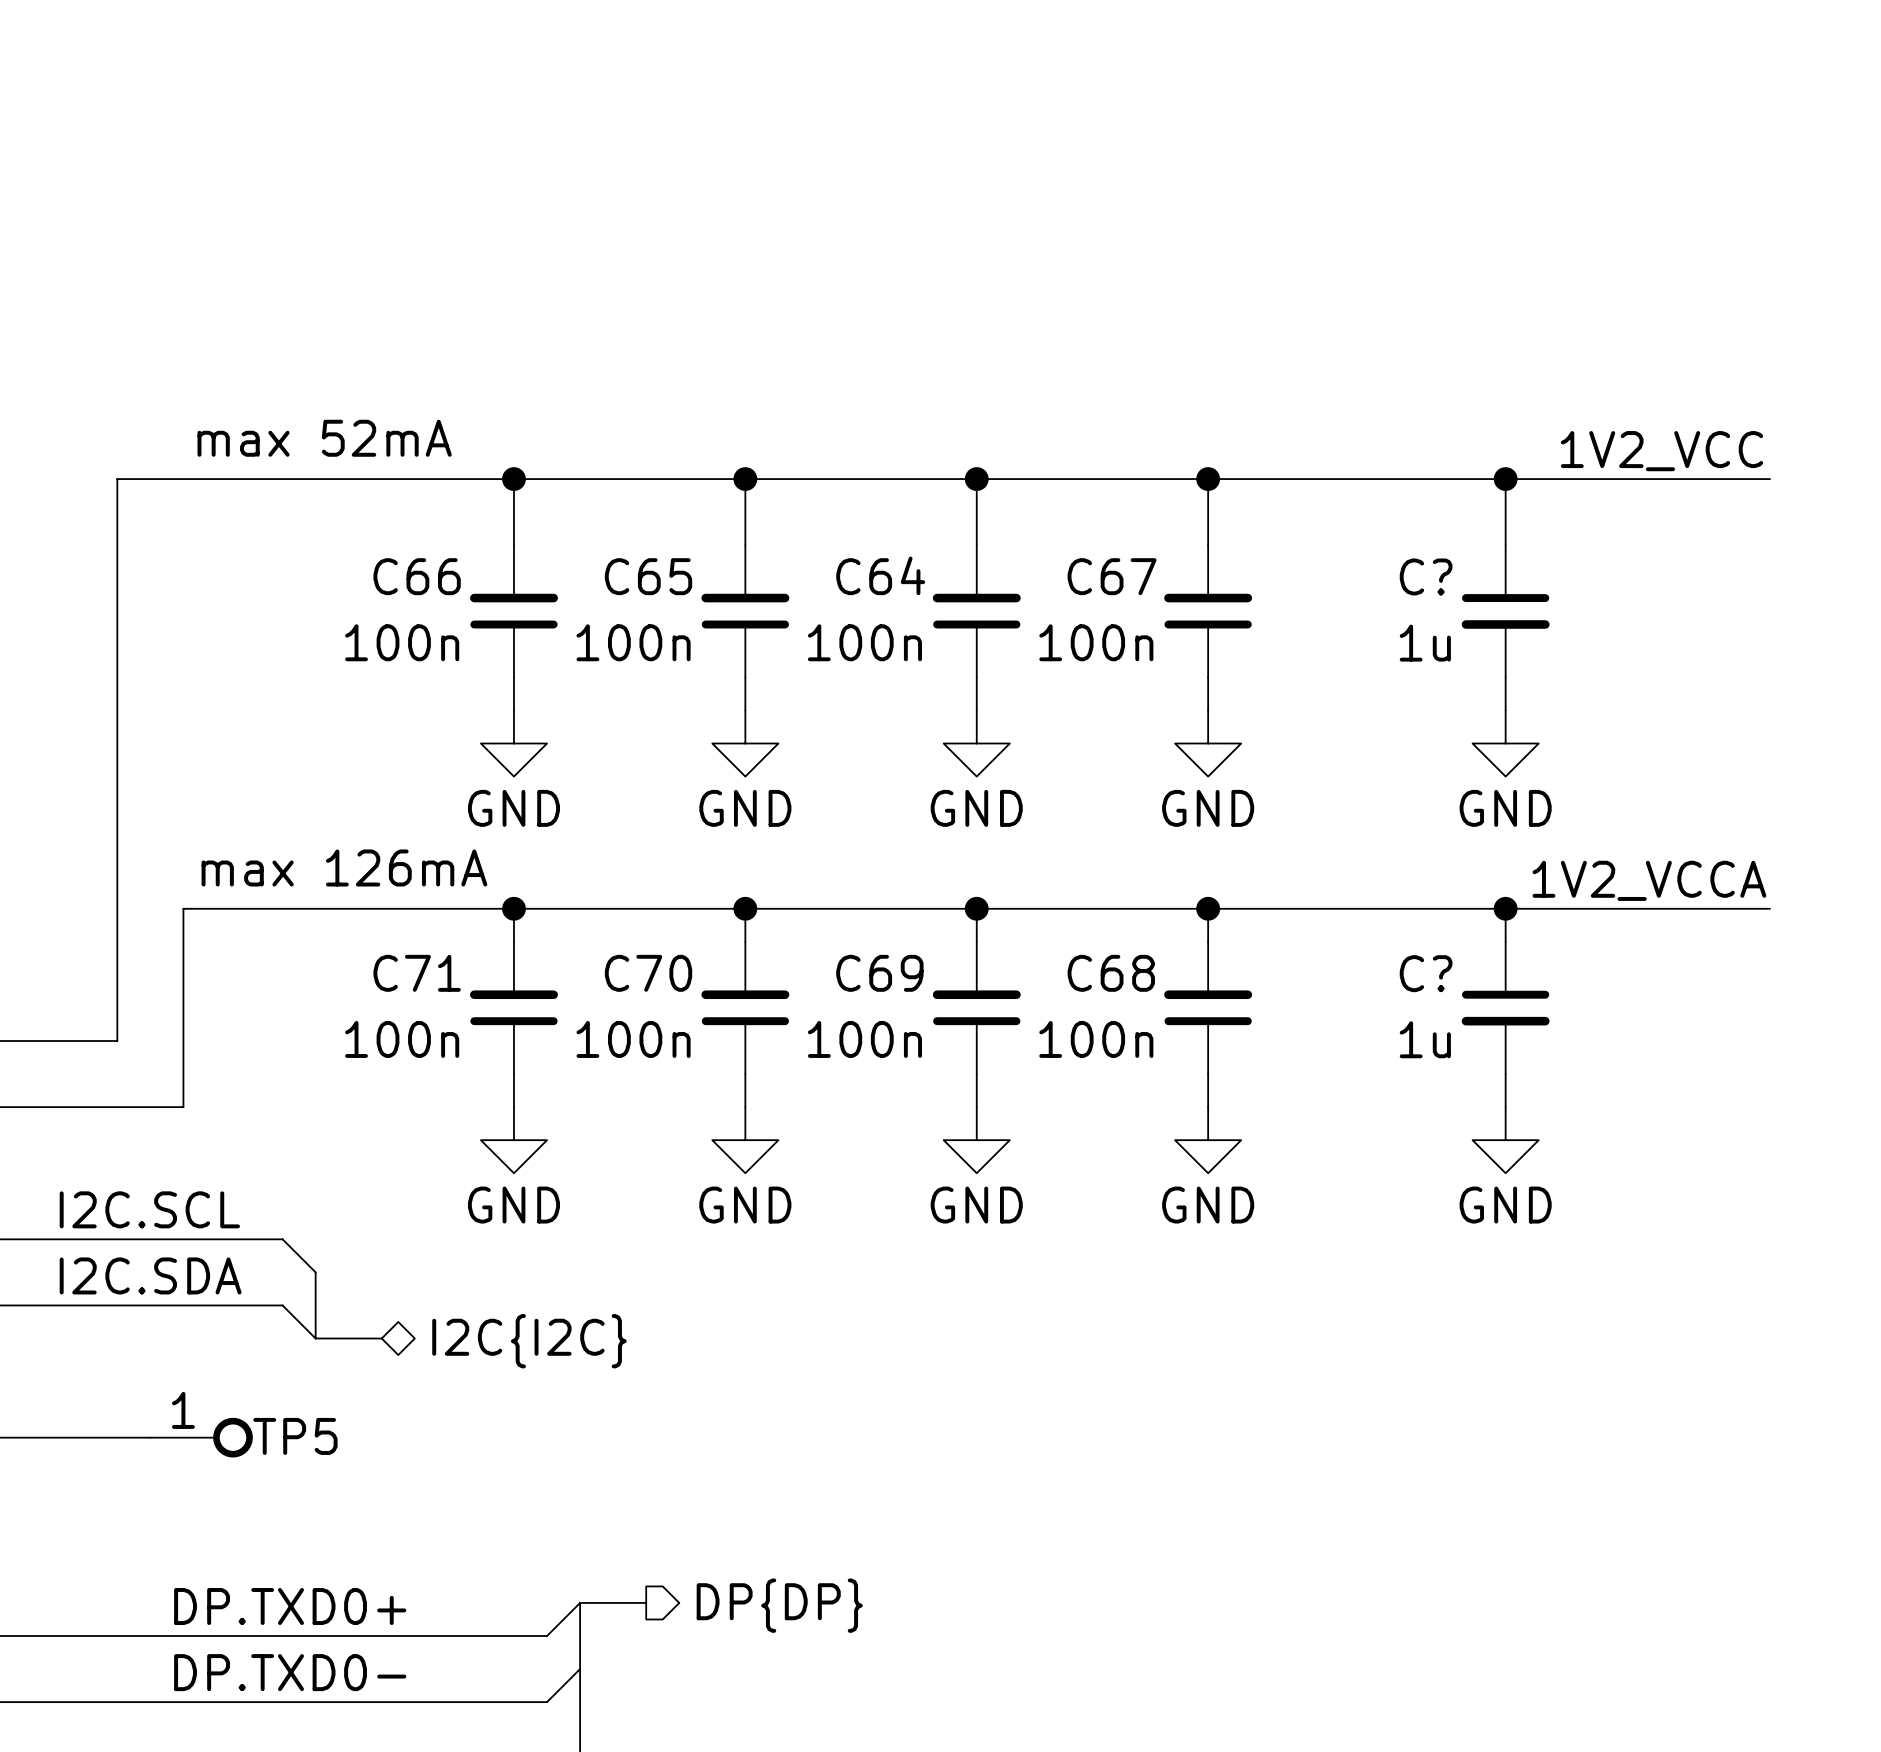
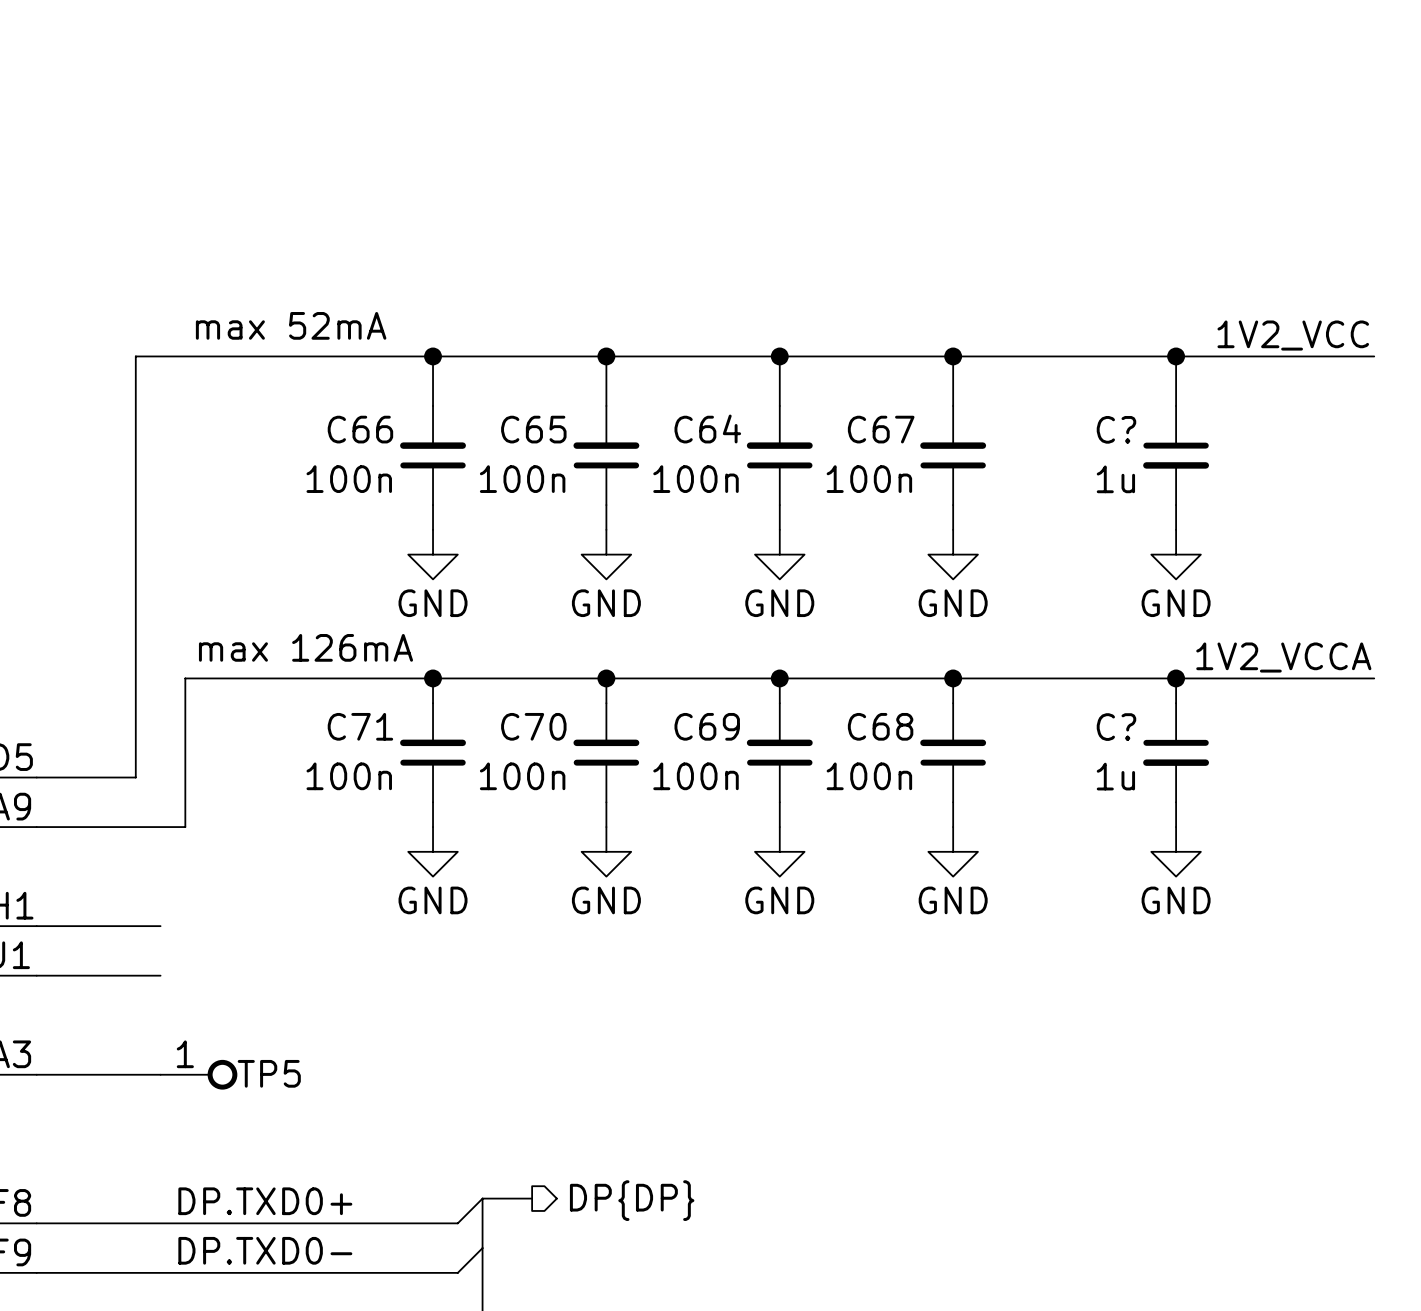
label: I2C.SCL (149, 1209) -> none
wire: (150, 1239) (282, 1239) (315, 1272) -> none
bus: (315, 1272) (315, 1338) (381, 1338) -> none
label: I2C.SDA (150, 1275) -> none
wire: (150, 1305) (282, 1305) (315, 1338) -> none
hierarchical label: I2C{I2C} (529, 1341) -> none

